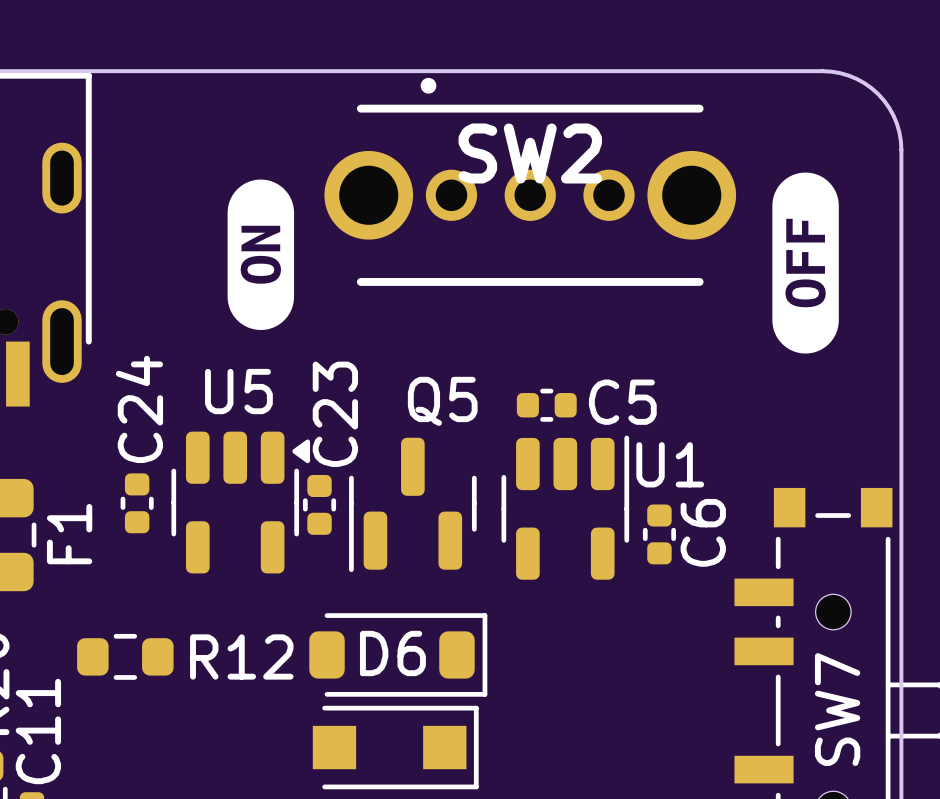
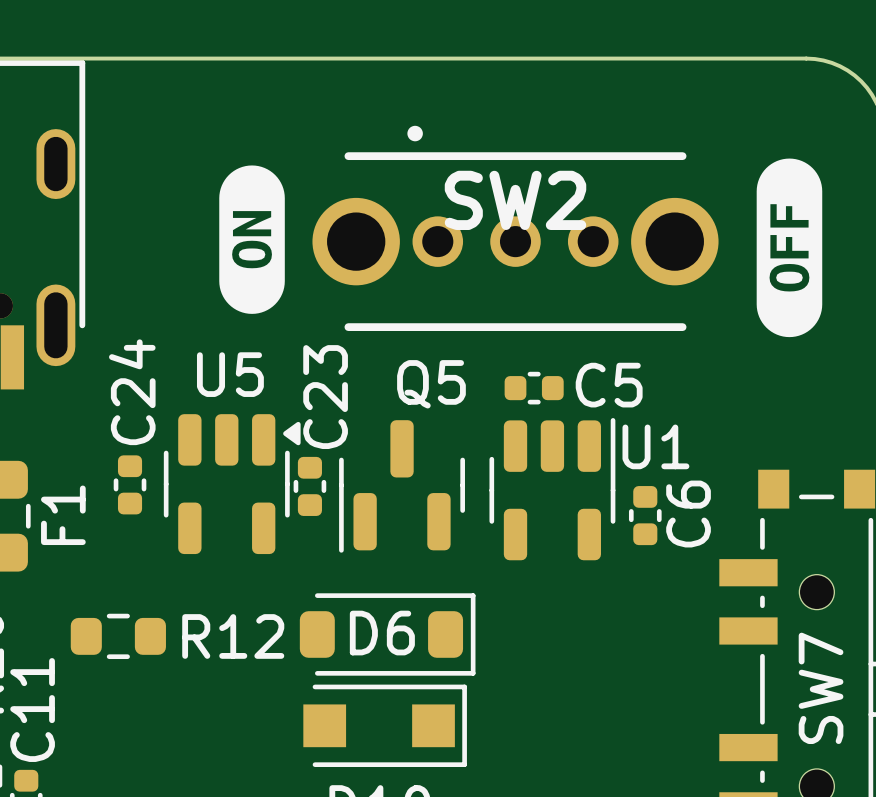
SW2 position: (530, 181) -> (515, 228)

